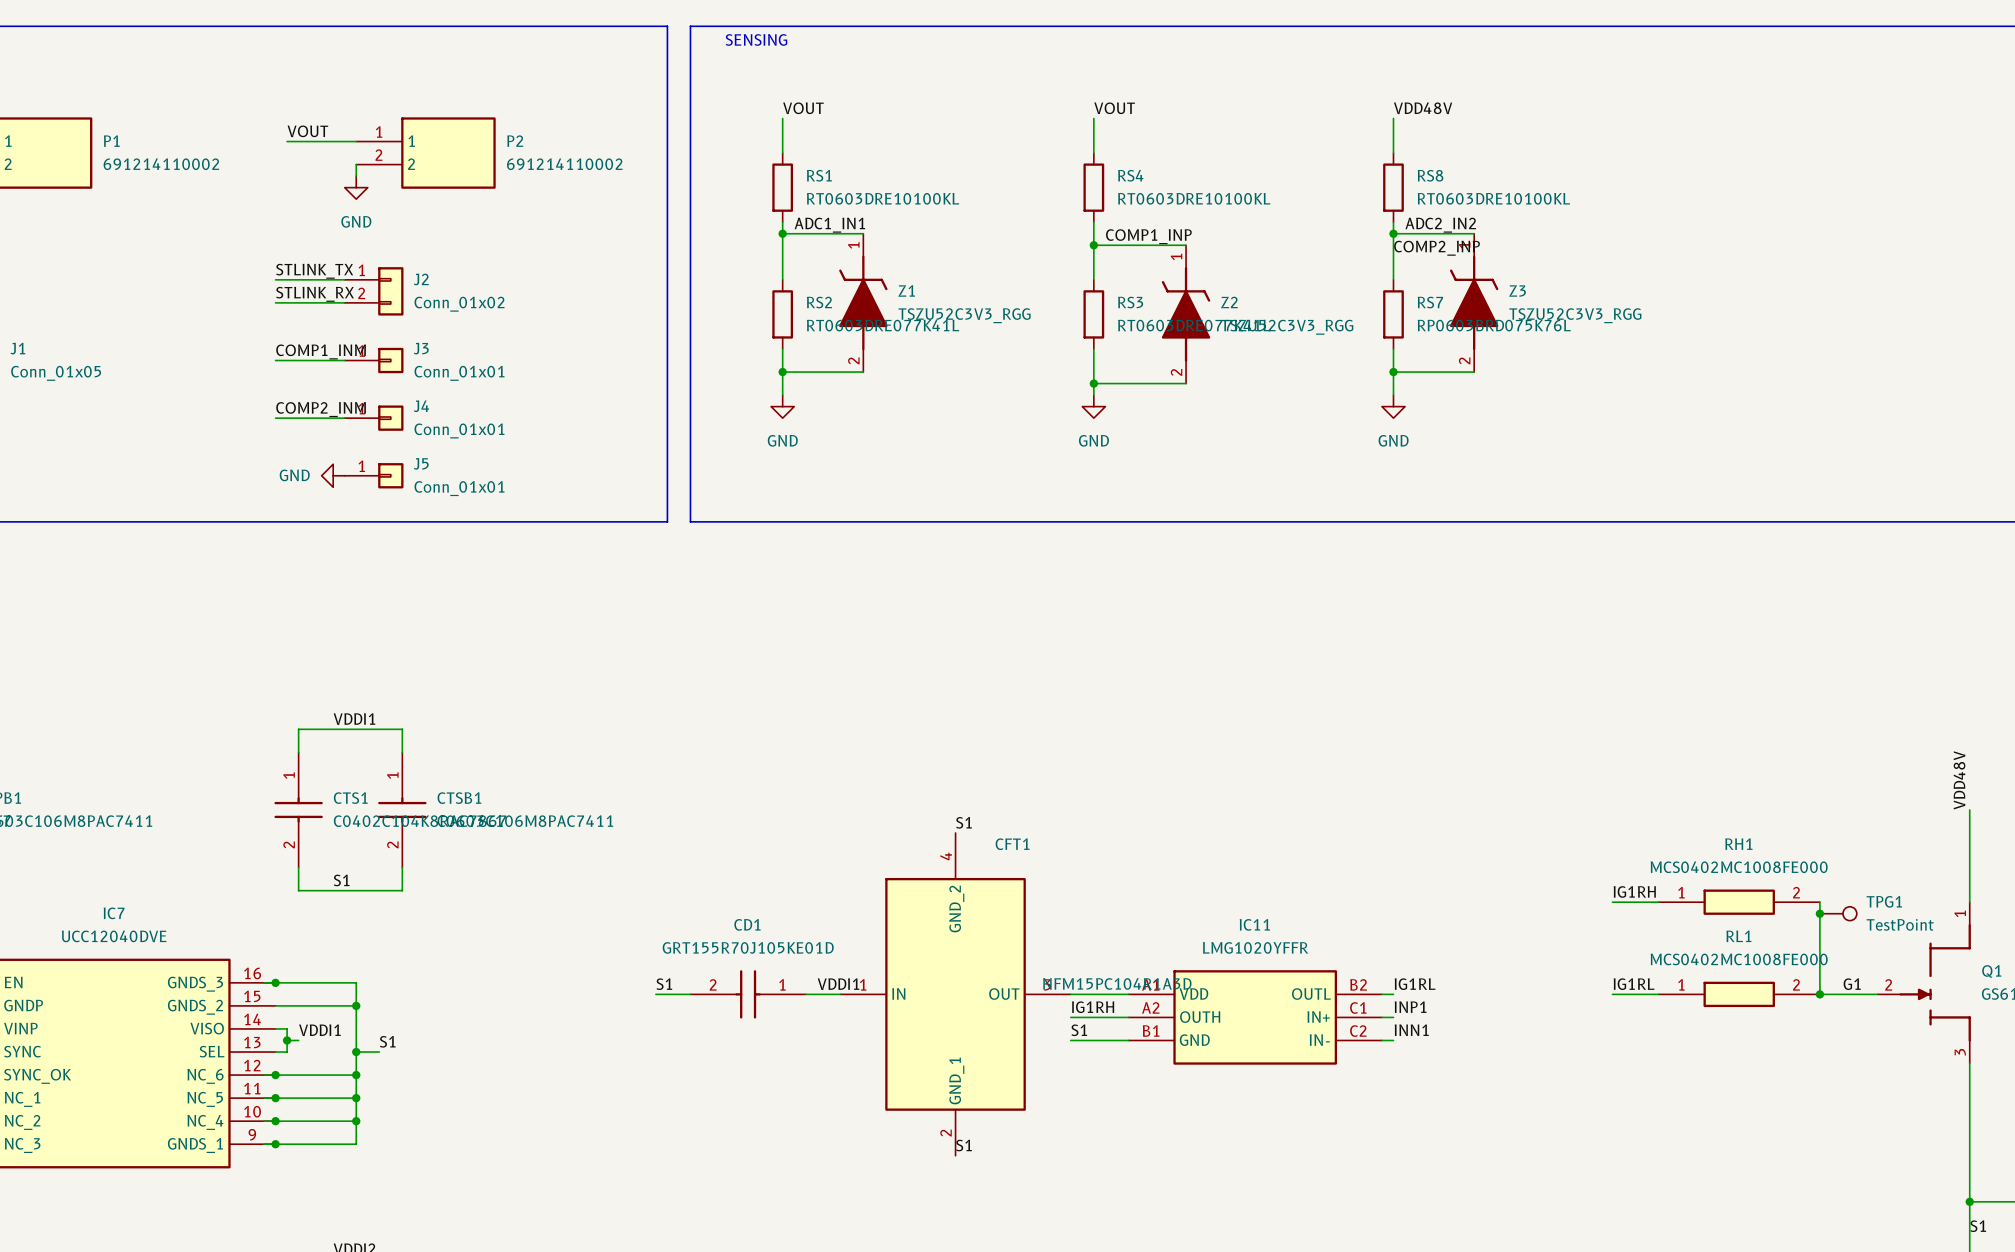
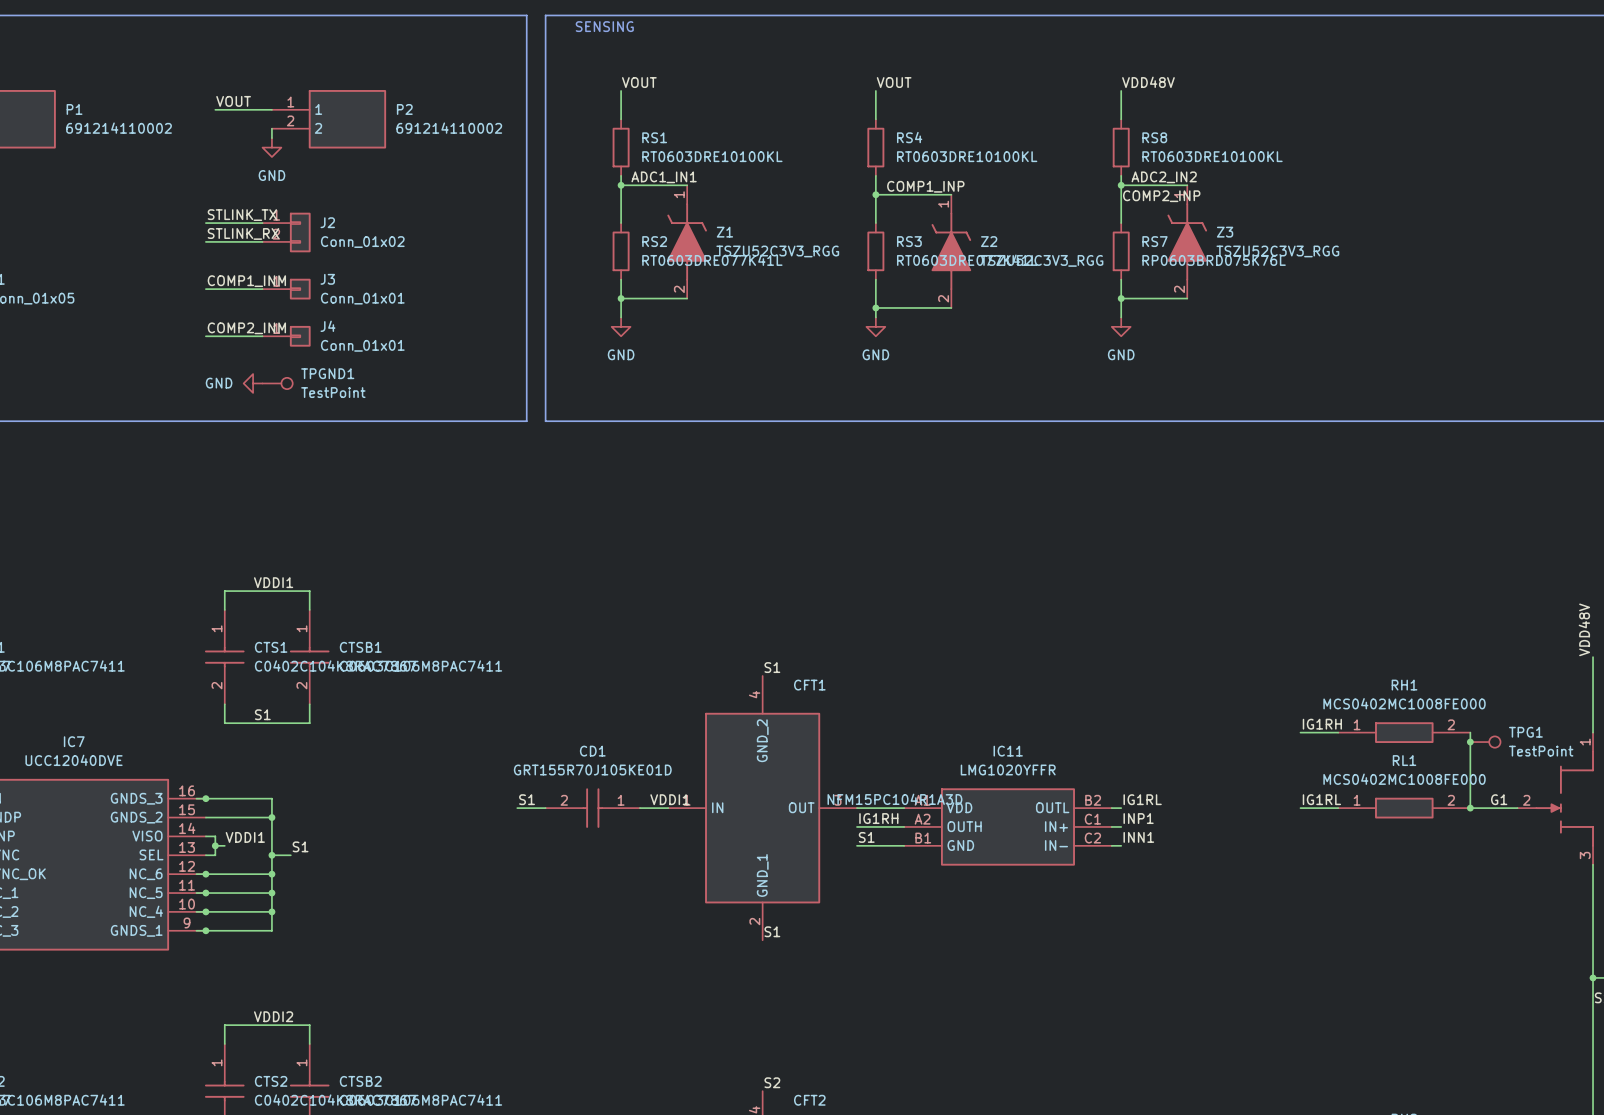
TPGND1: none -> TestPoint (277, 383)
J5: Conn_01x01 (374, 475) -> none

